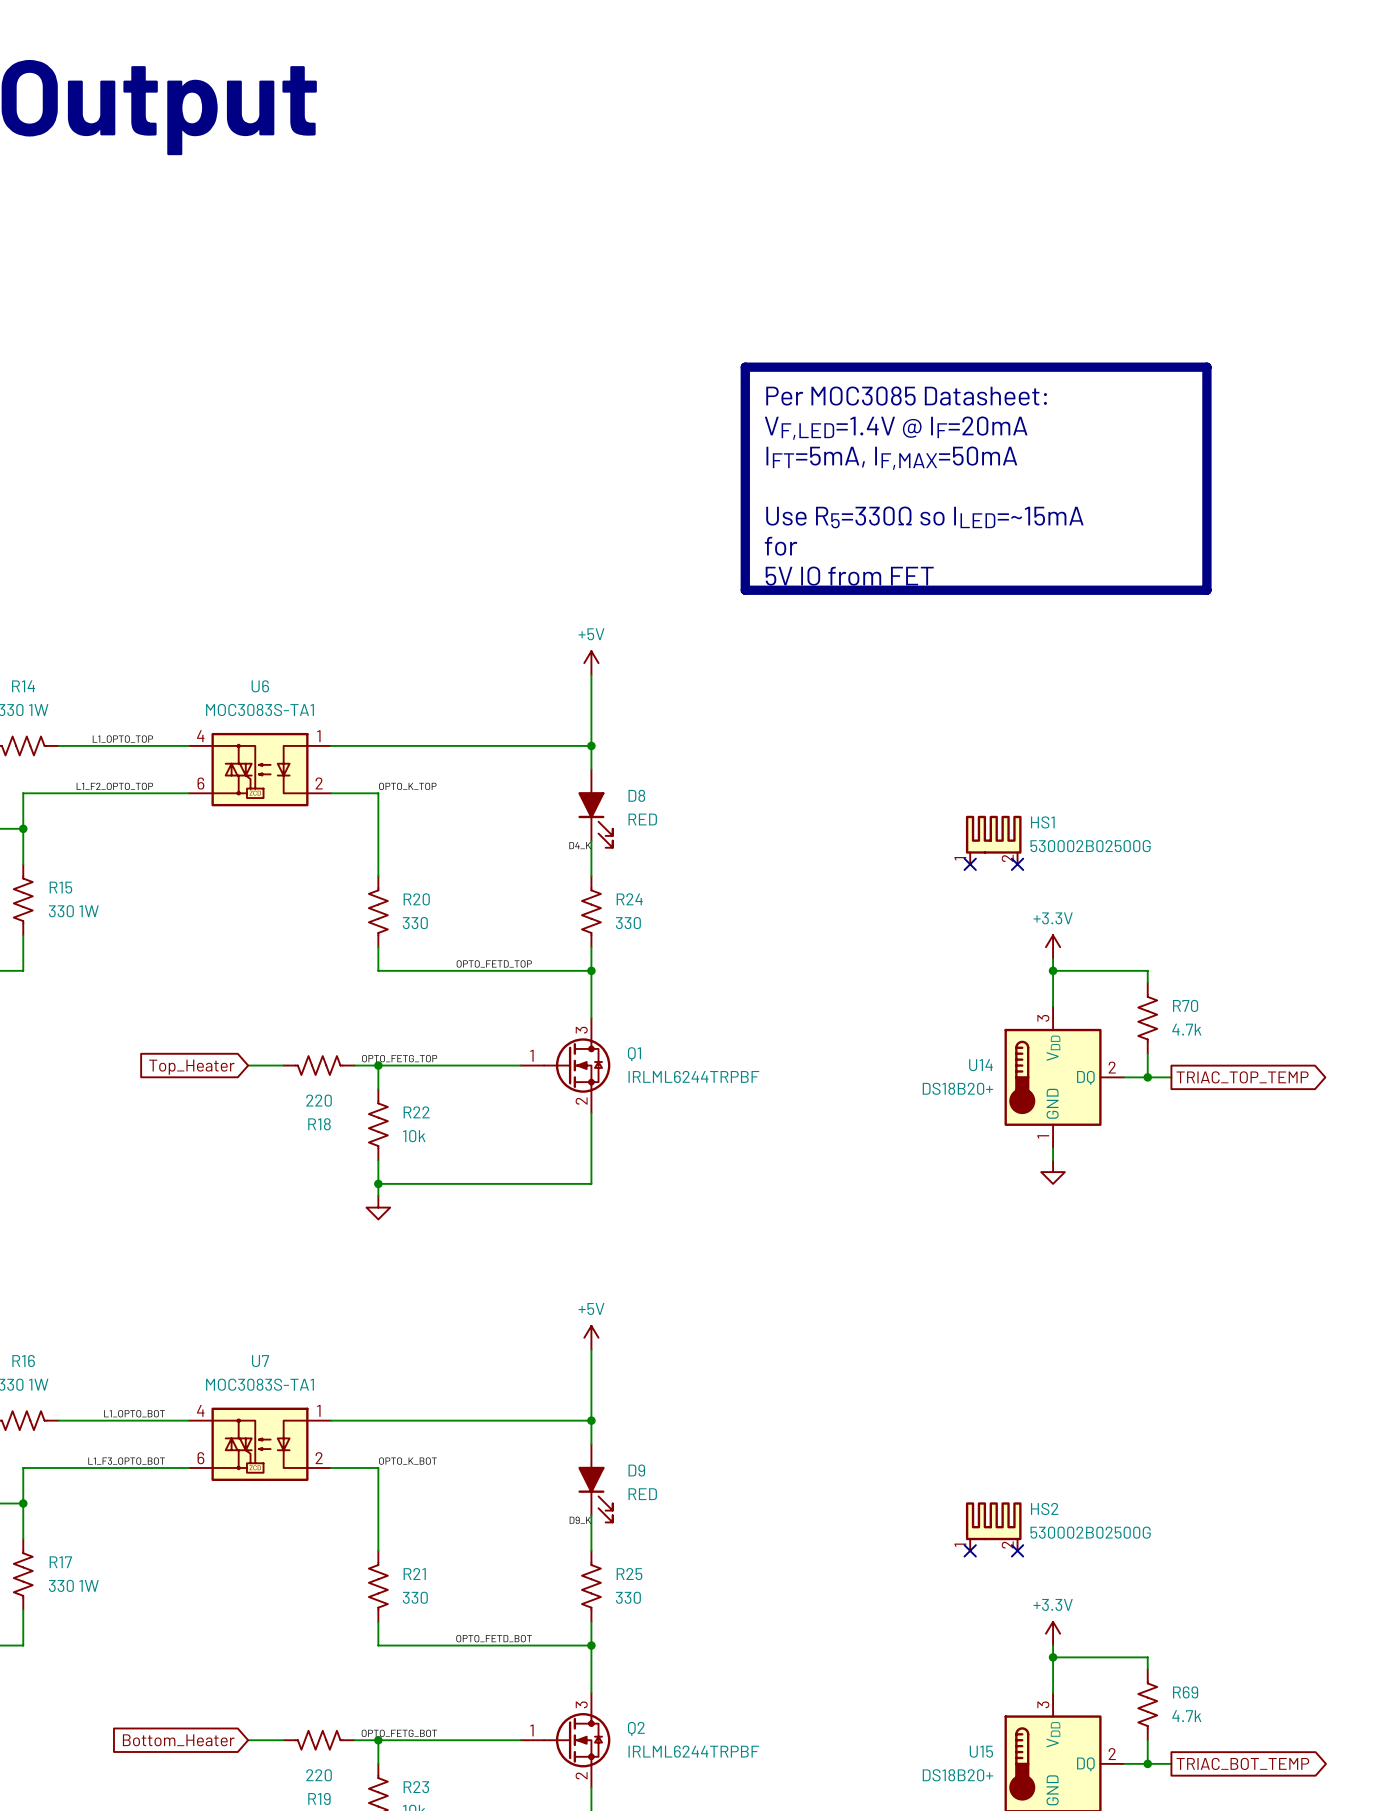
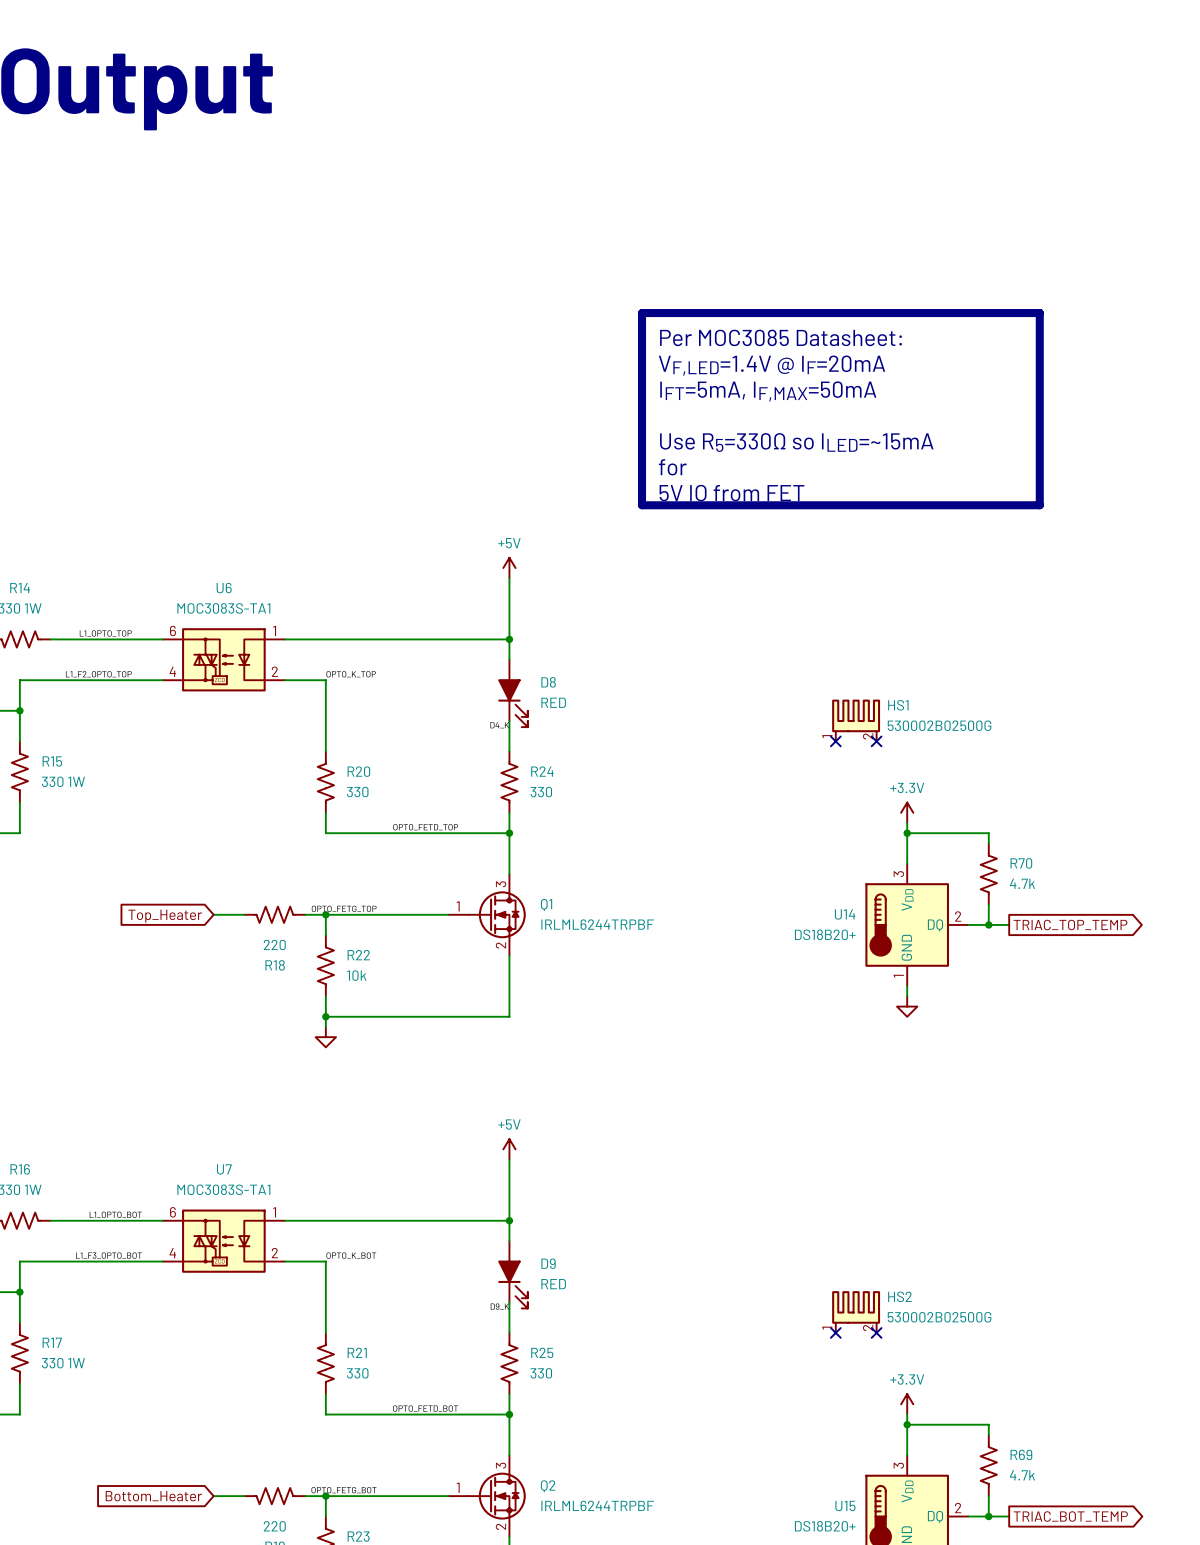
U6 pin number: 4 (200, 736) -> 6 (172, 630)
U6 pin number: 6 (200, 783) -> 4 (172, 671)
U7 pin number: 4 (200, 1410) -> 6 (172, 1212)
U7 pin number: 6 (200, 1458) -> 4 (172, 1253)

